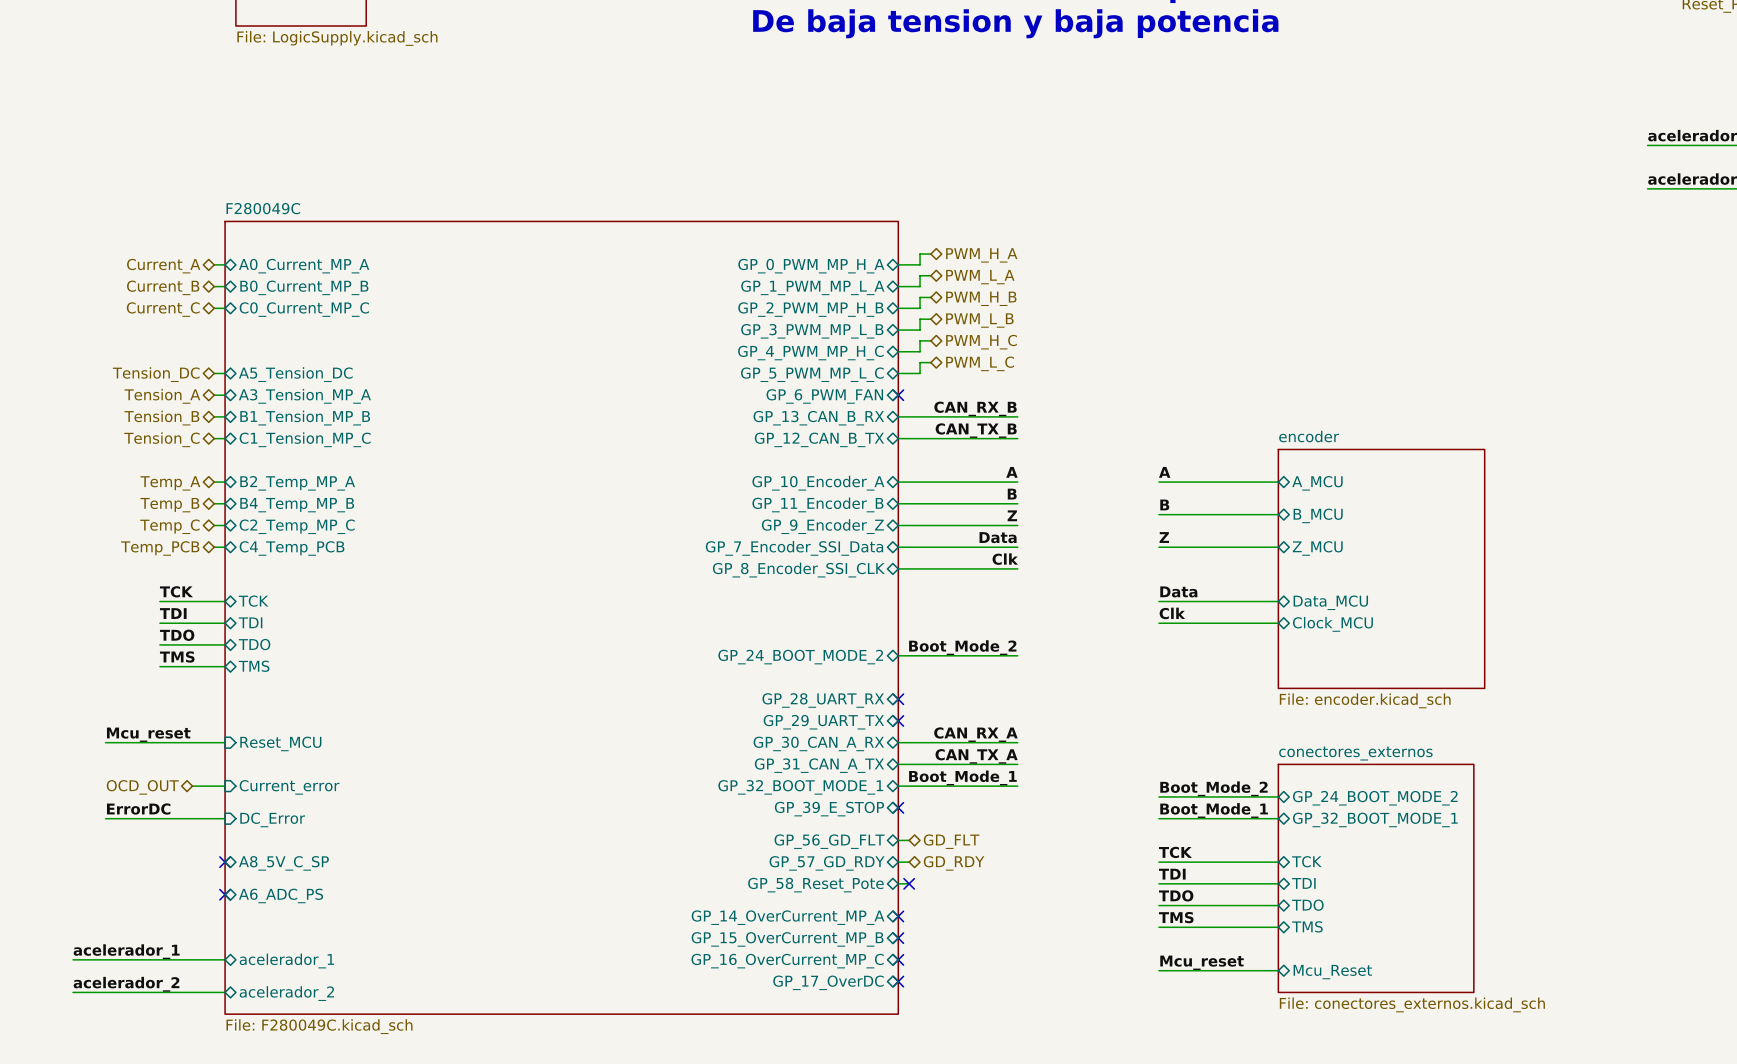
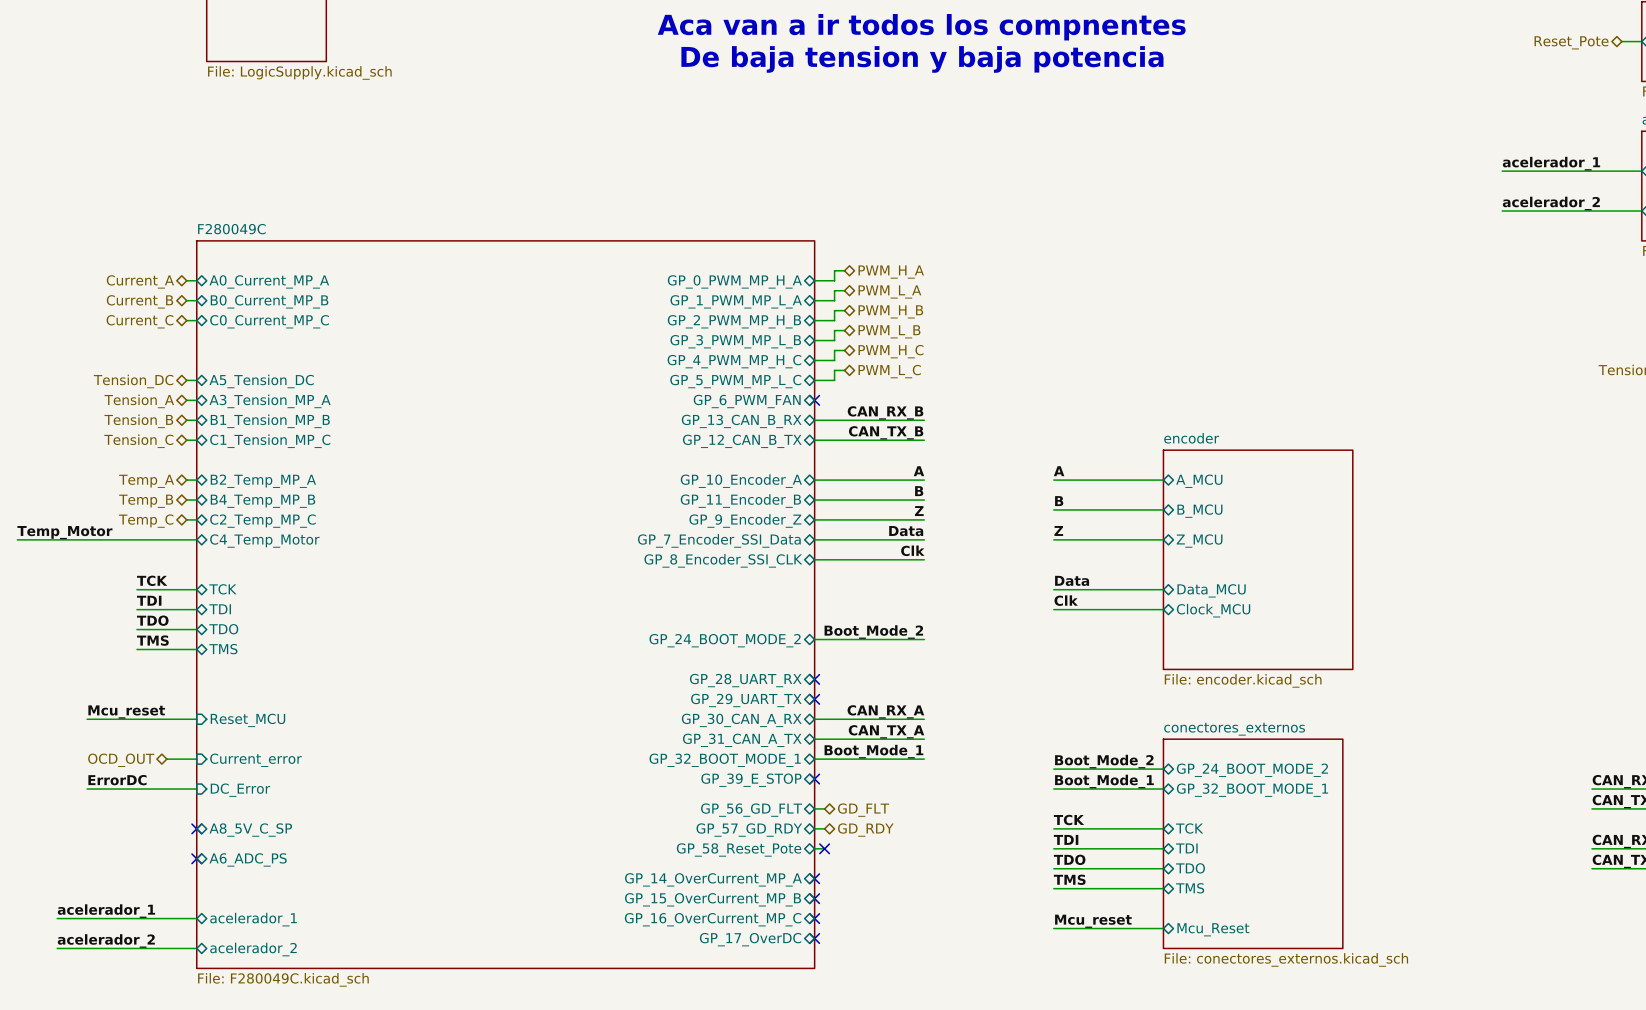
label: none -> Temp_Motor (64, 532)
wire: none -> (17, 539) (186, 539)
hierarchical label: Temp_PCB (160, 548) -> none
sheet pin: C4_Temp_PCB (292, 548) -> C4_Temp_Motor (264, 541)

